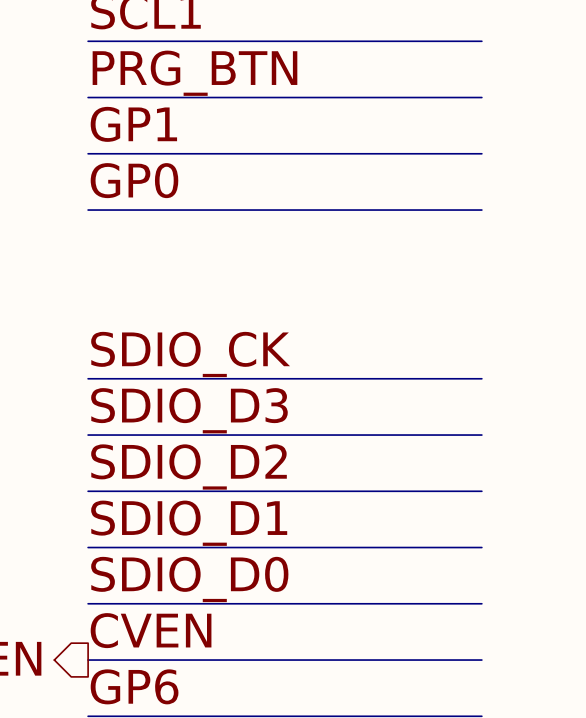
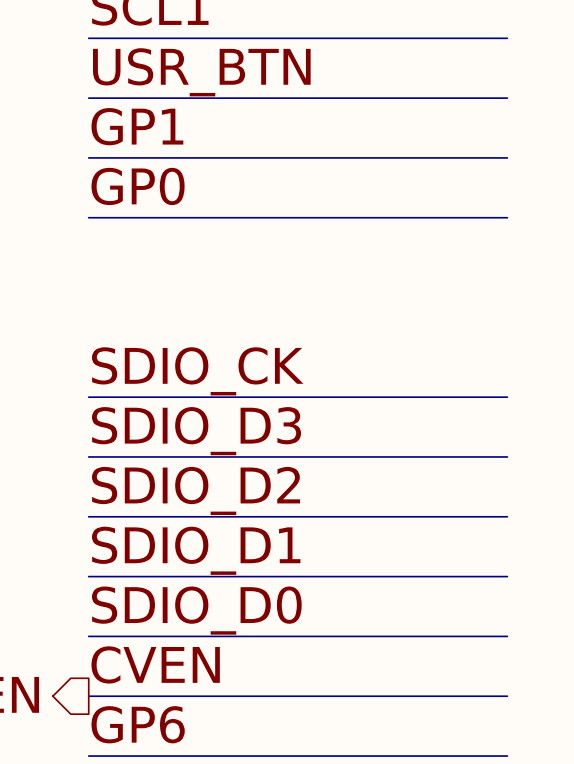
label: PRG_BTN (194, 73) -> USR_BTN (201, 72)

